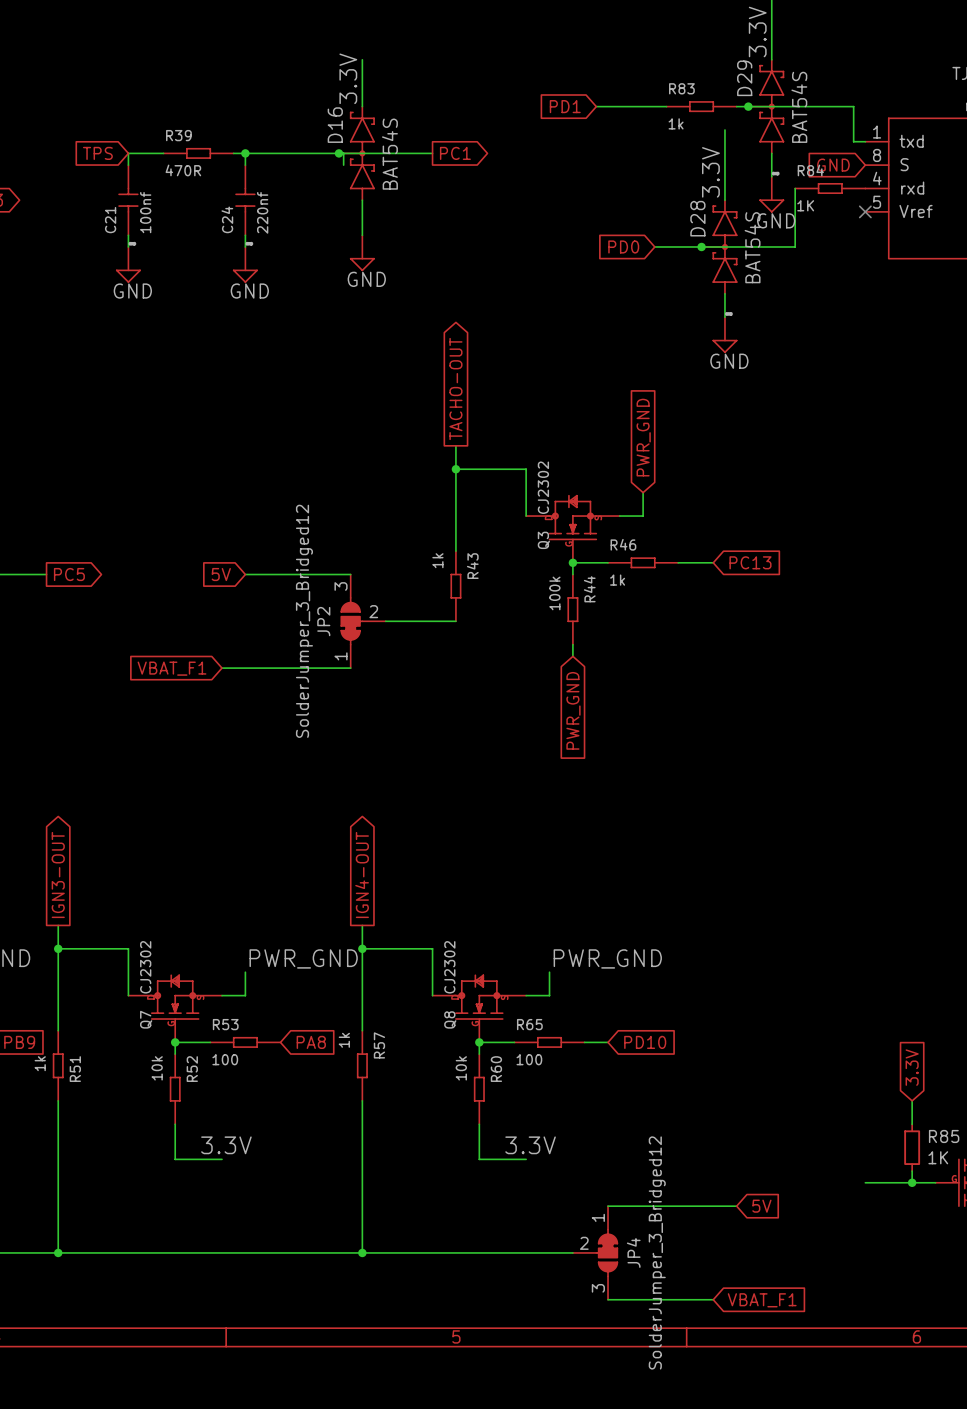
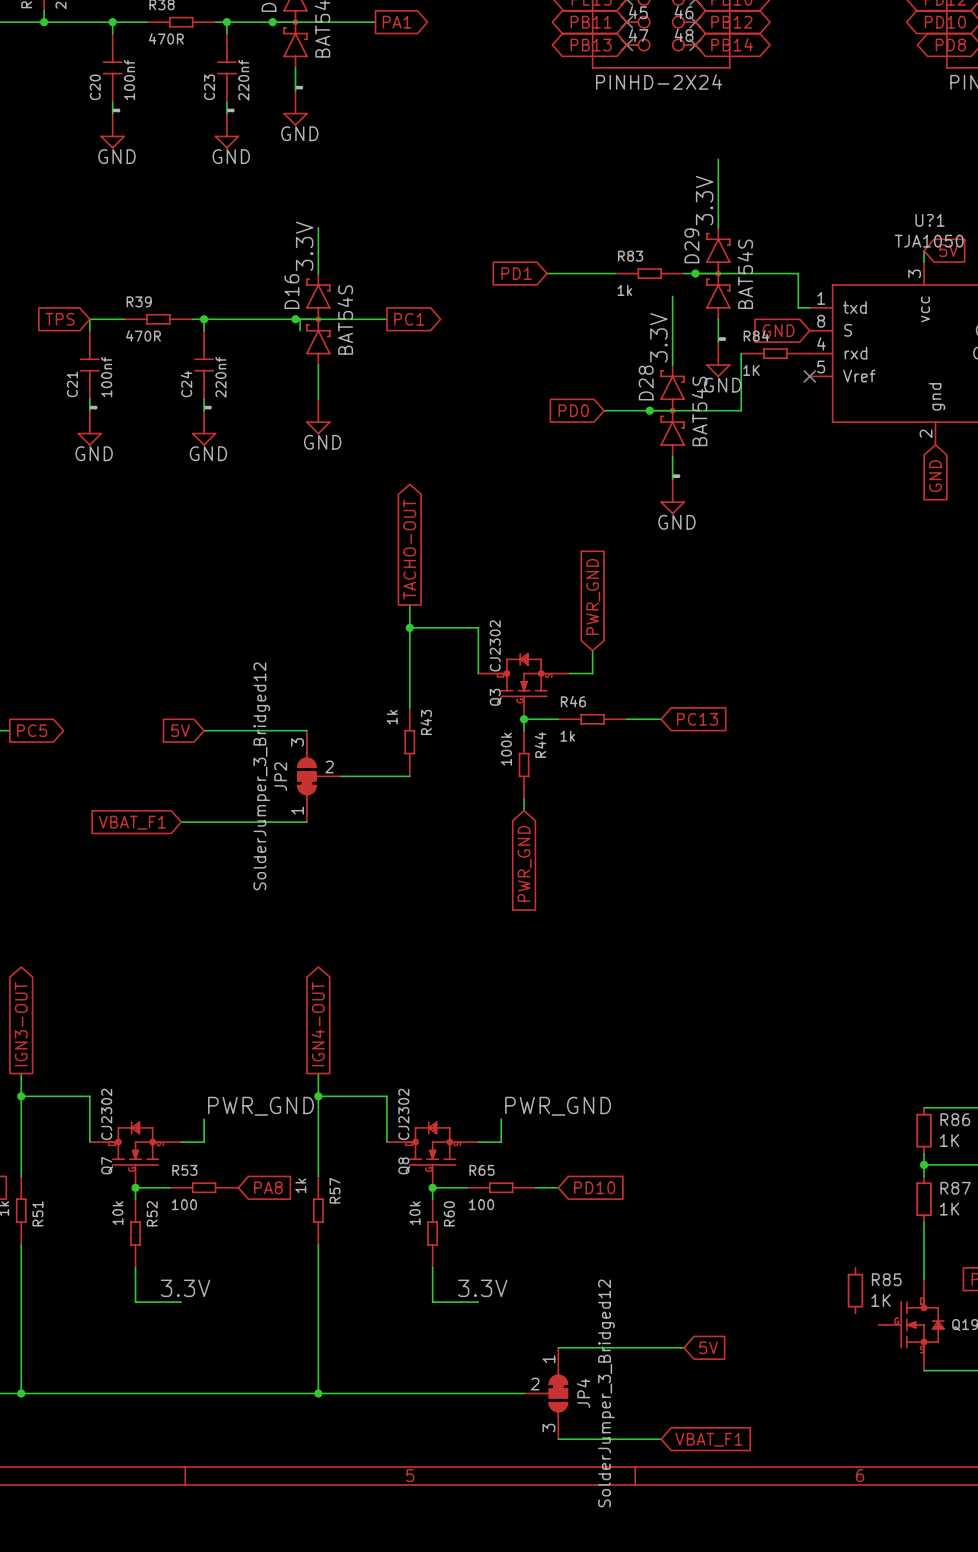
global label: 3.3V (912, 1067) -> none
wire: (912, 1100) (912, 1124) -> none
wire: (912, 1171) (912, 1182) -> none
wire: (865, 1182) (935, 1182) -> none
junction: (912, 1182) -> none

